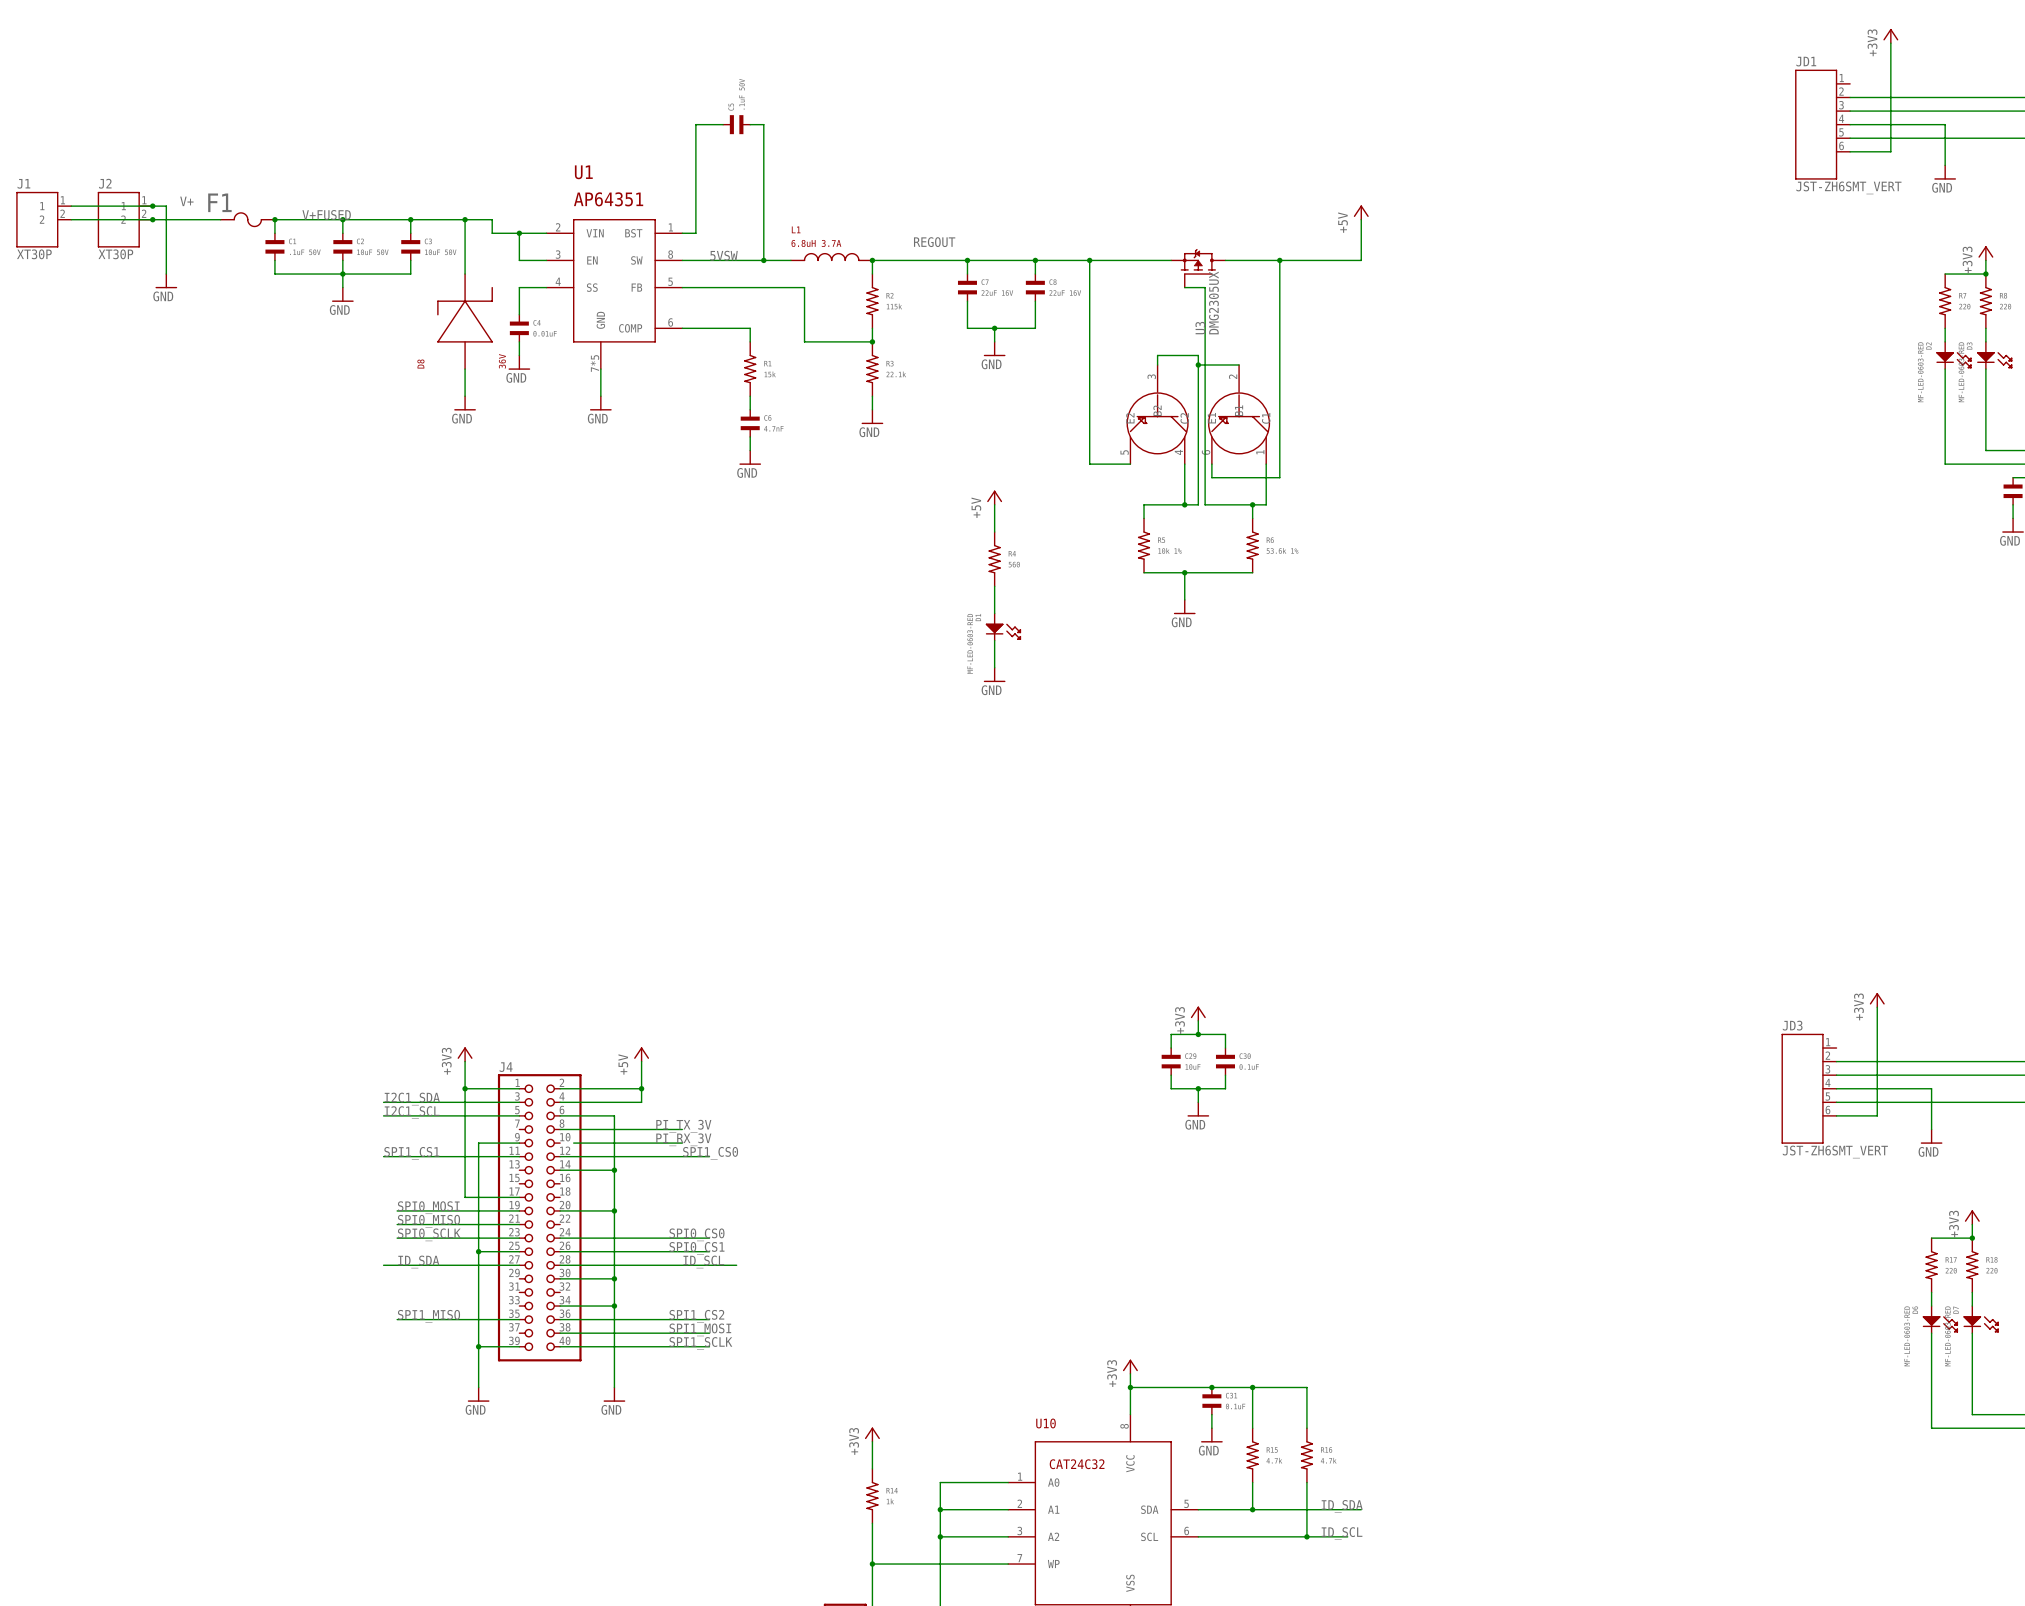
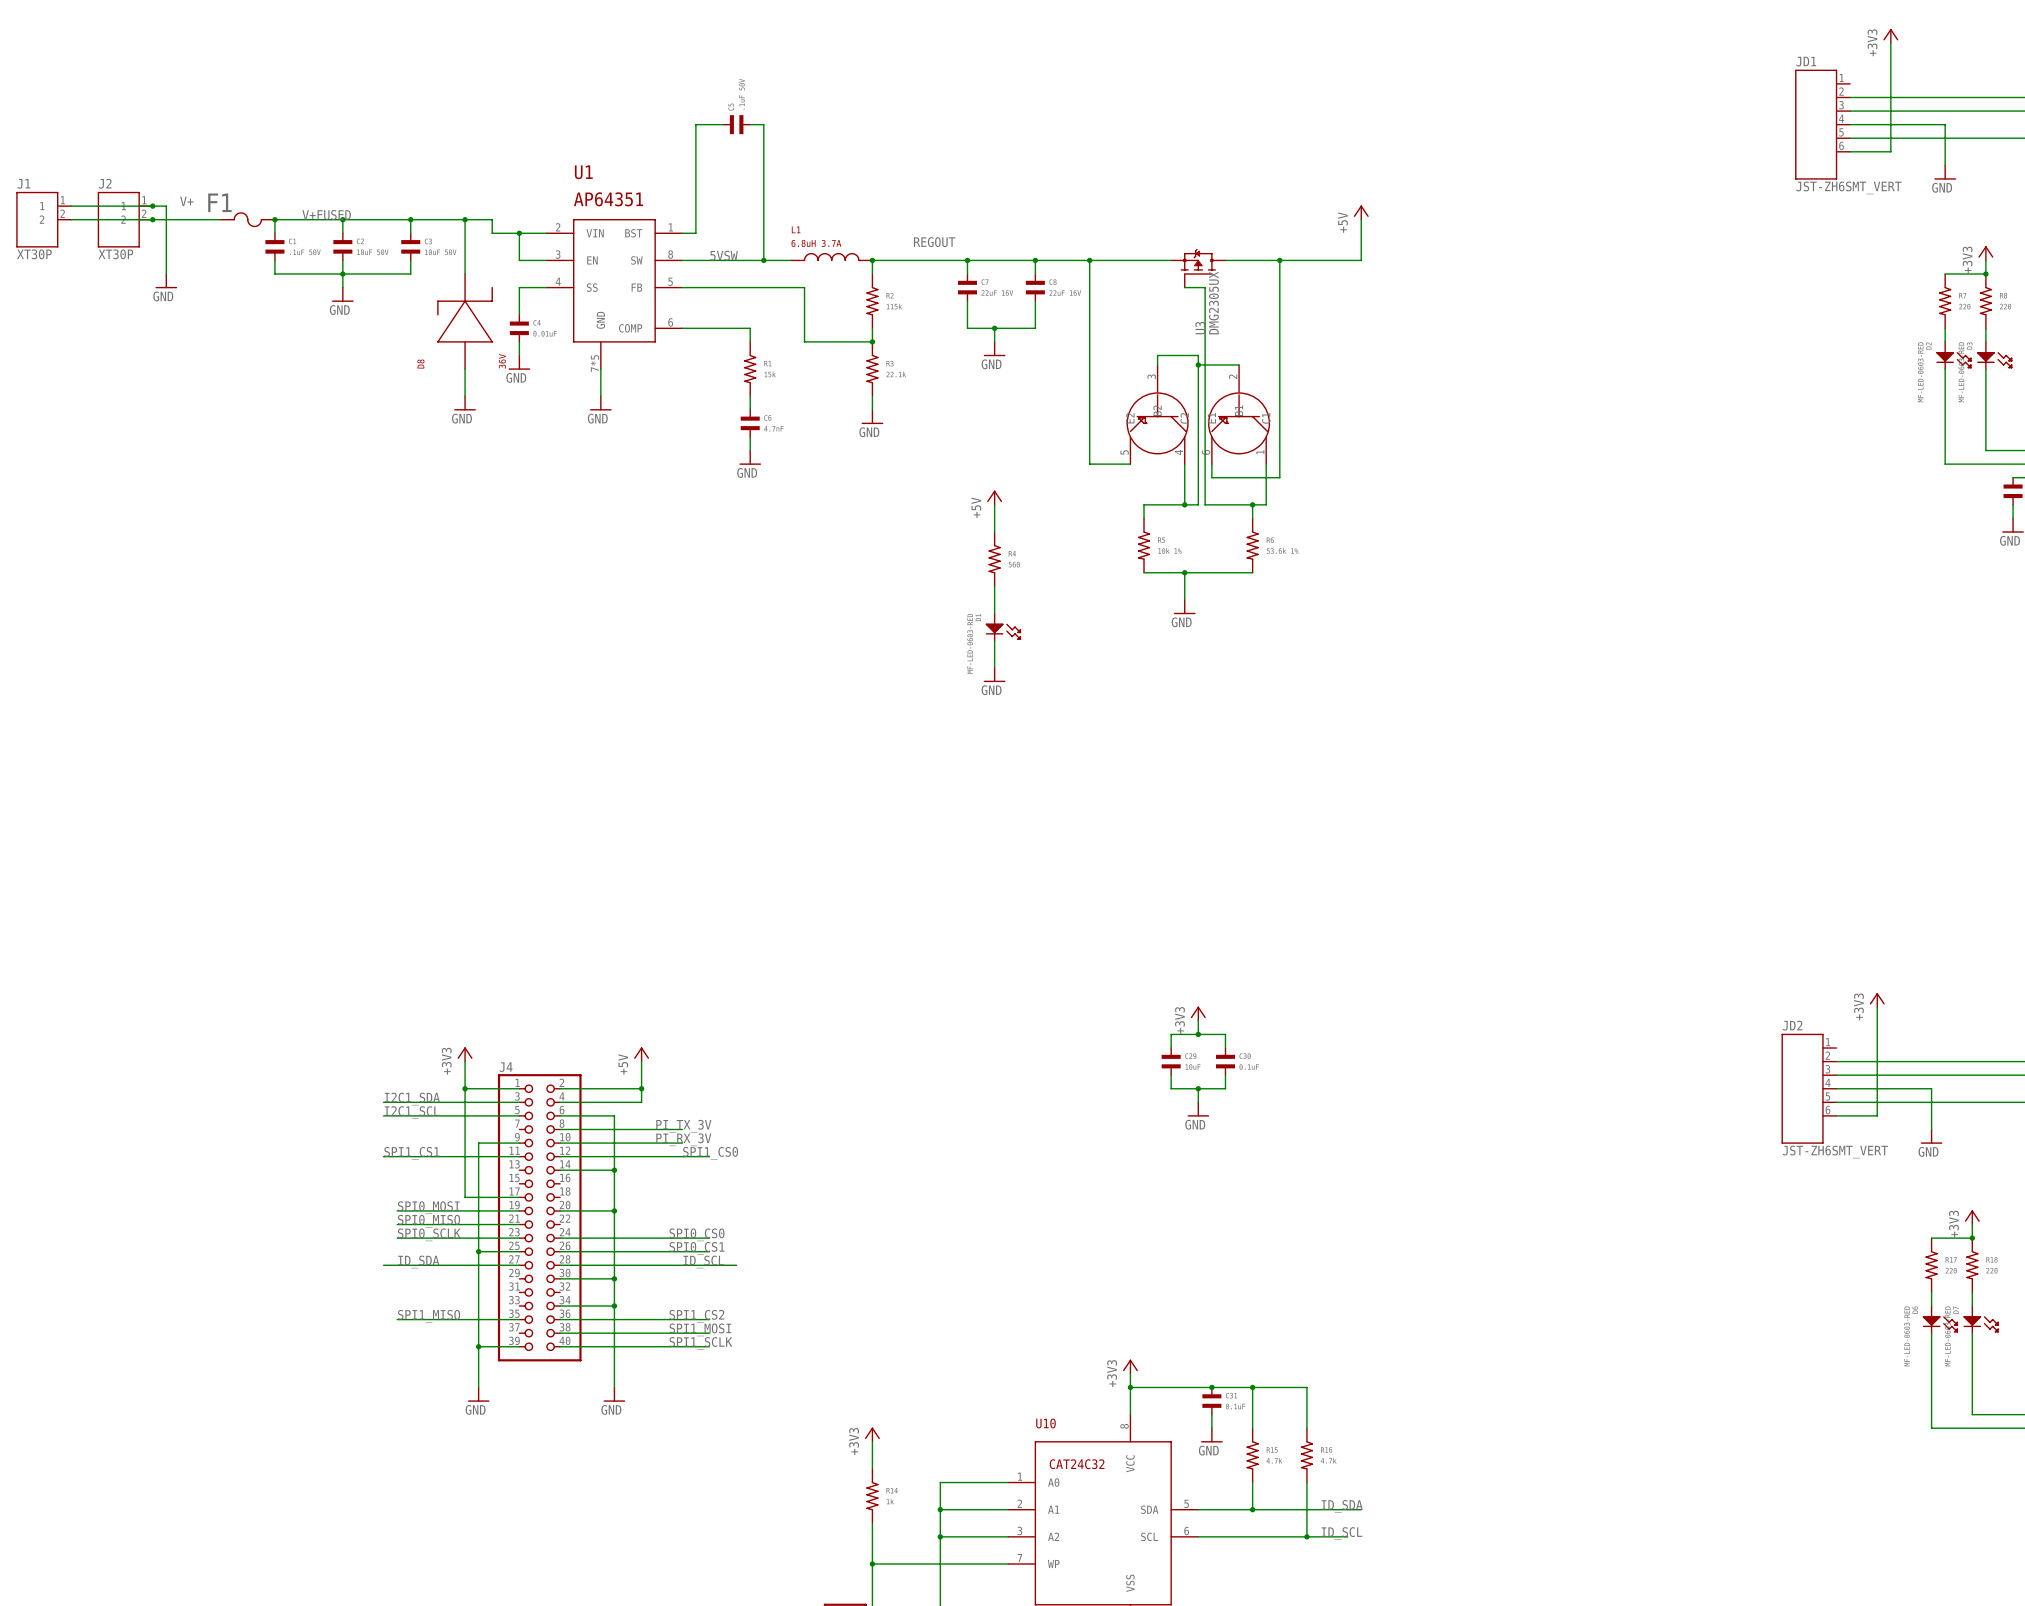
JD3 name: JD3 (1792, 1025) -> JD2 (1792, 1025)
wire: none -> (560, 1143) (573, 1143)

